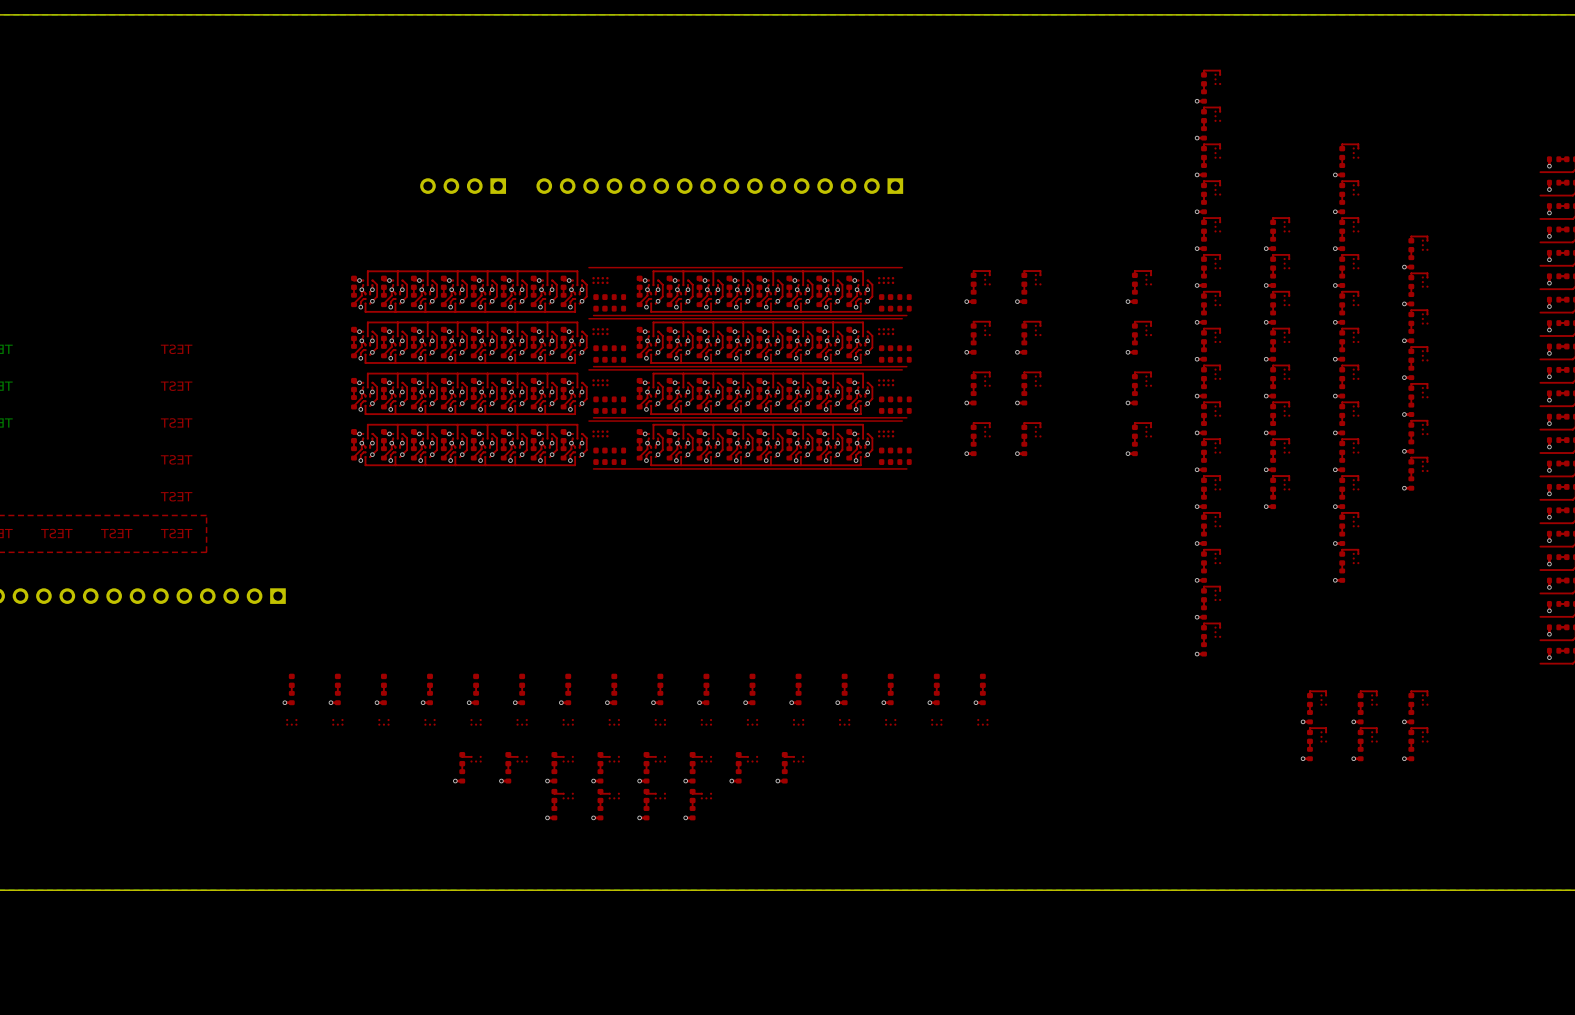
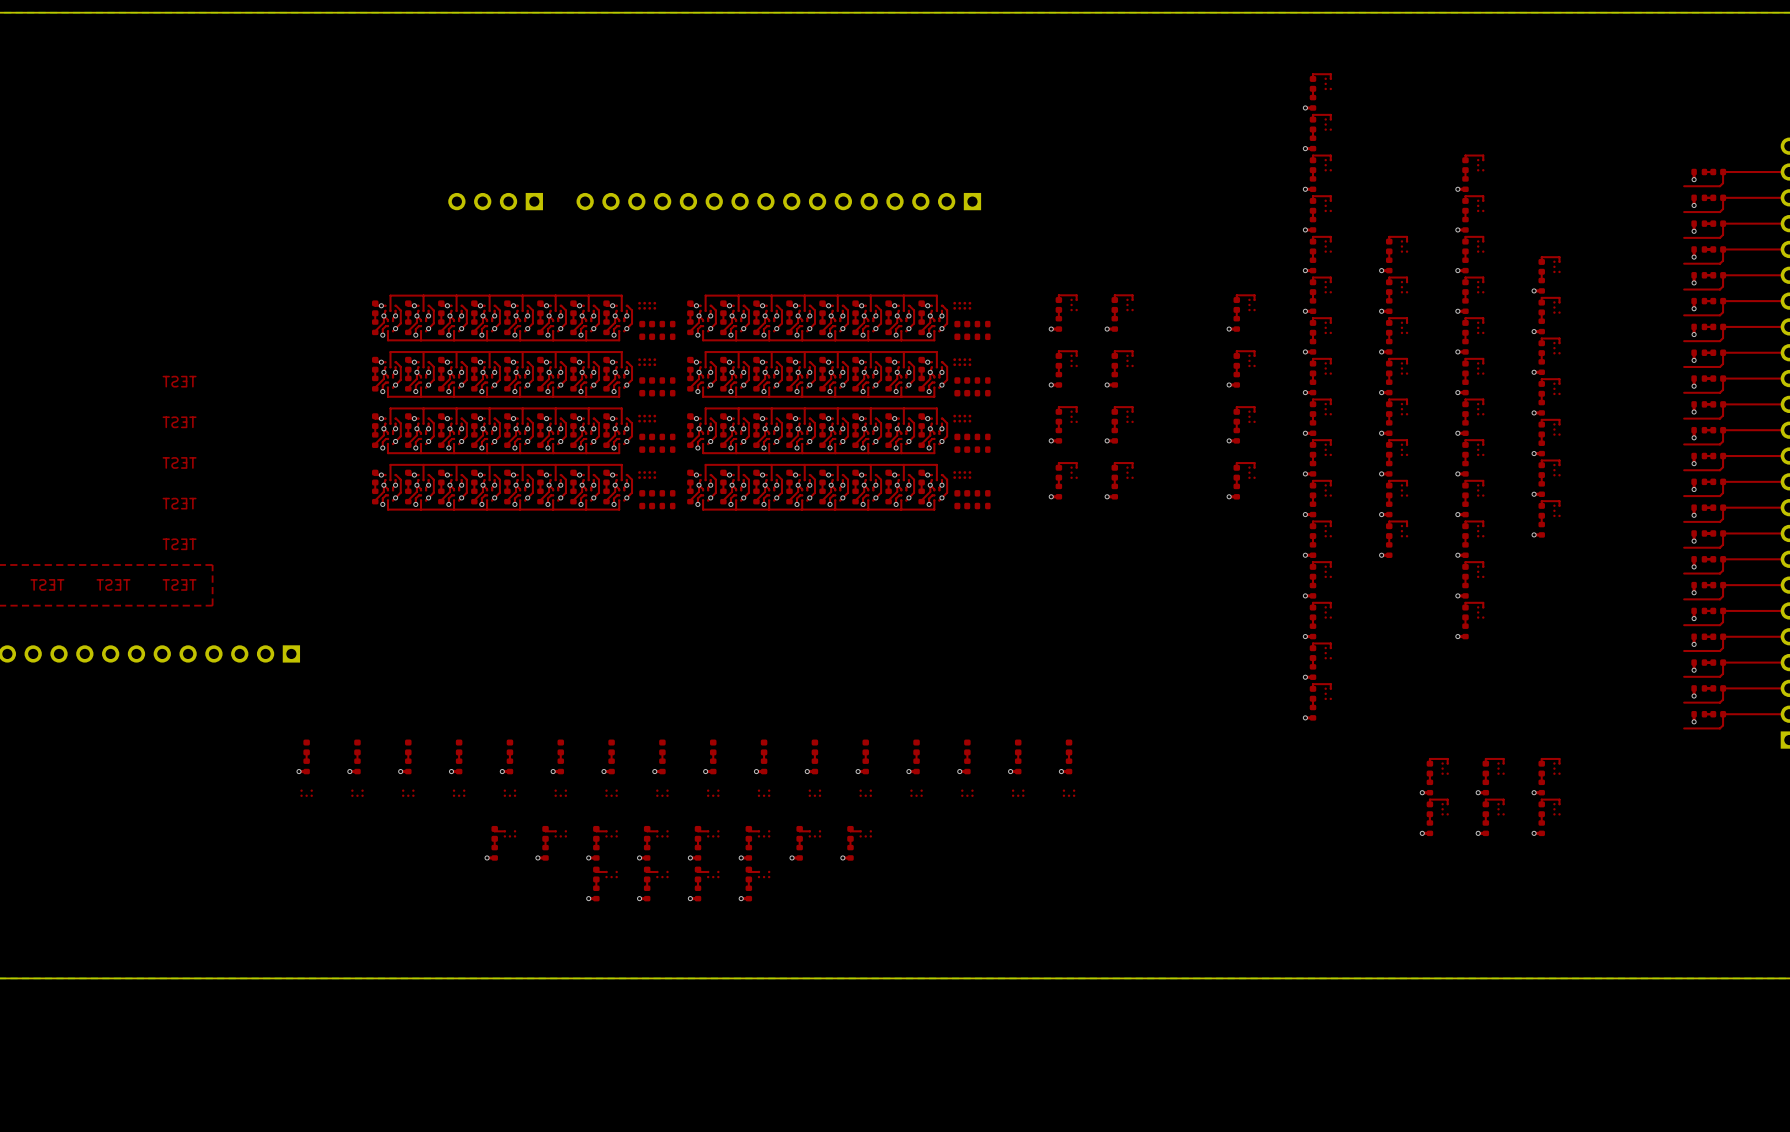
top track: (902, 267) (588, 267) -> none
top track: (906, 315) (593, 315) -> none
top track: (902, 318) (588, 318) -> none
top track: (906, 366) (593, 366) -> none
top track: (902, 369) (588, 369) -> none
top track: (906, 417) (593, 417) -> none
top track: (902, 421) (588, 421) -> none
top track: (906, 468) (593, 468) -> none

